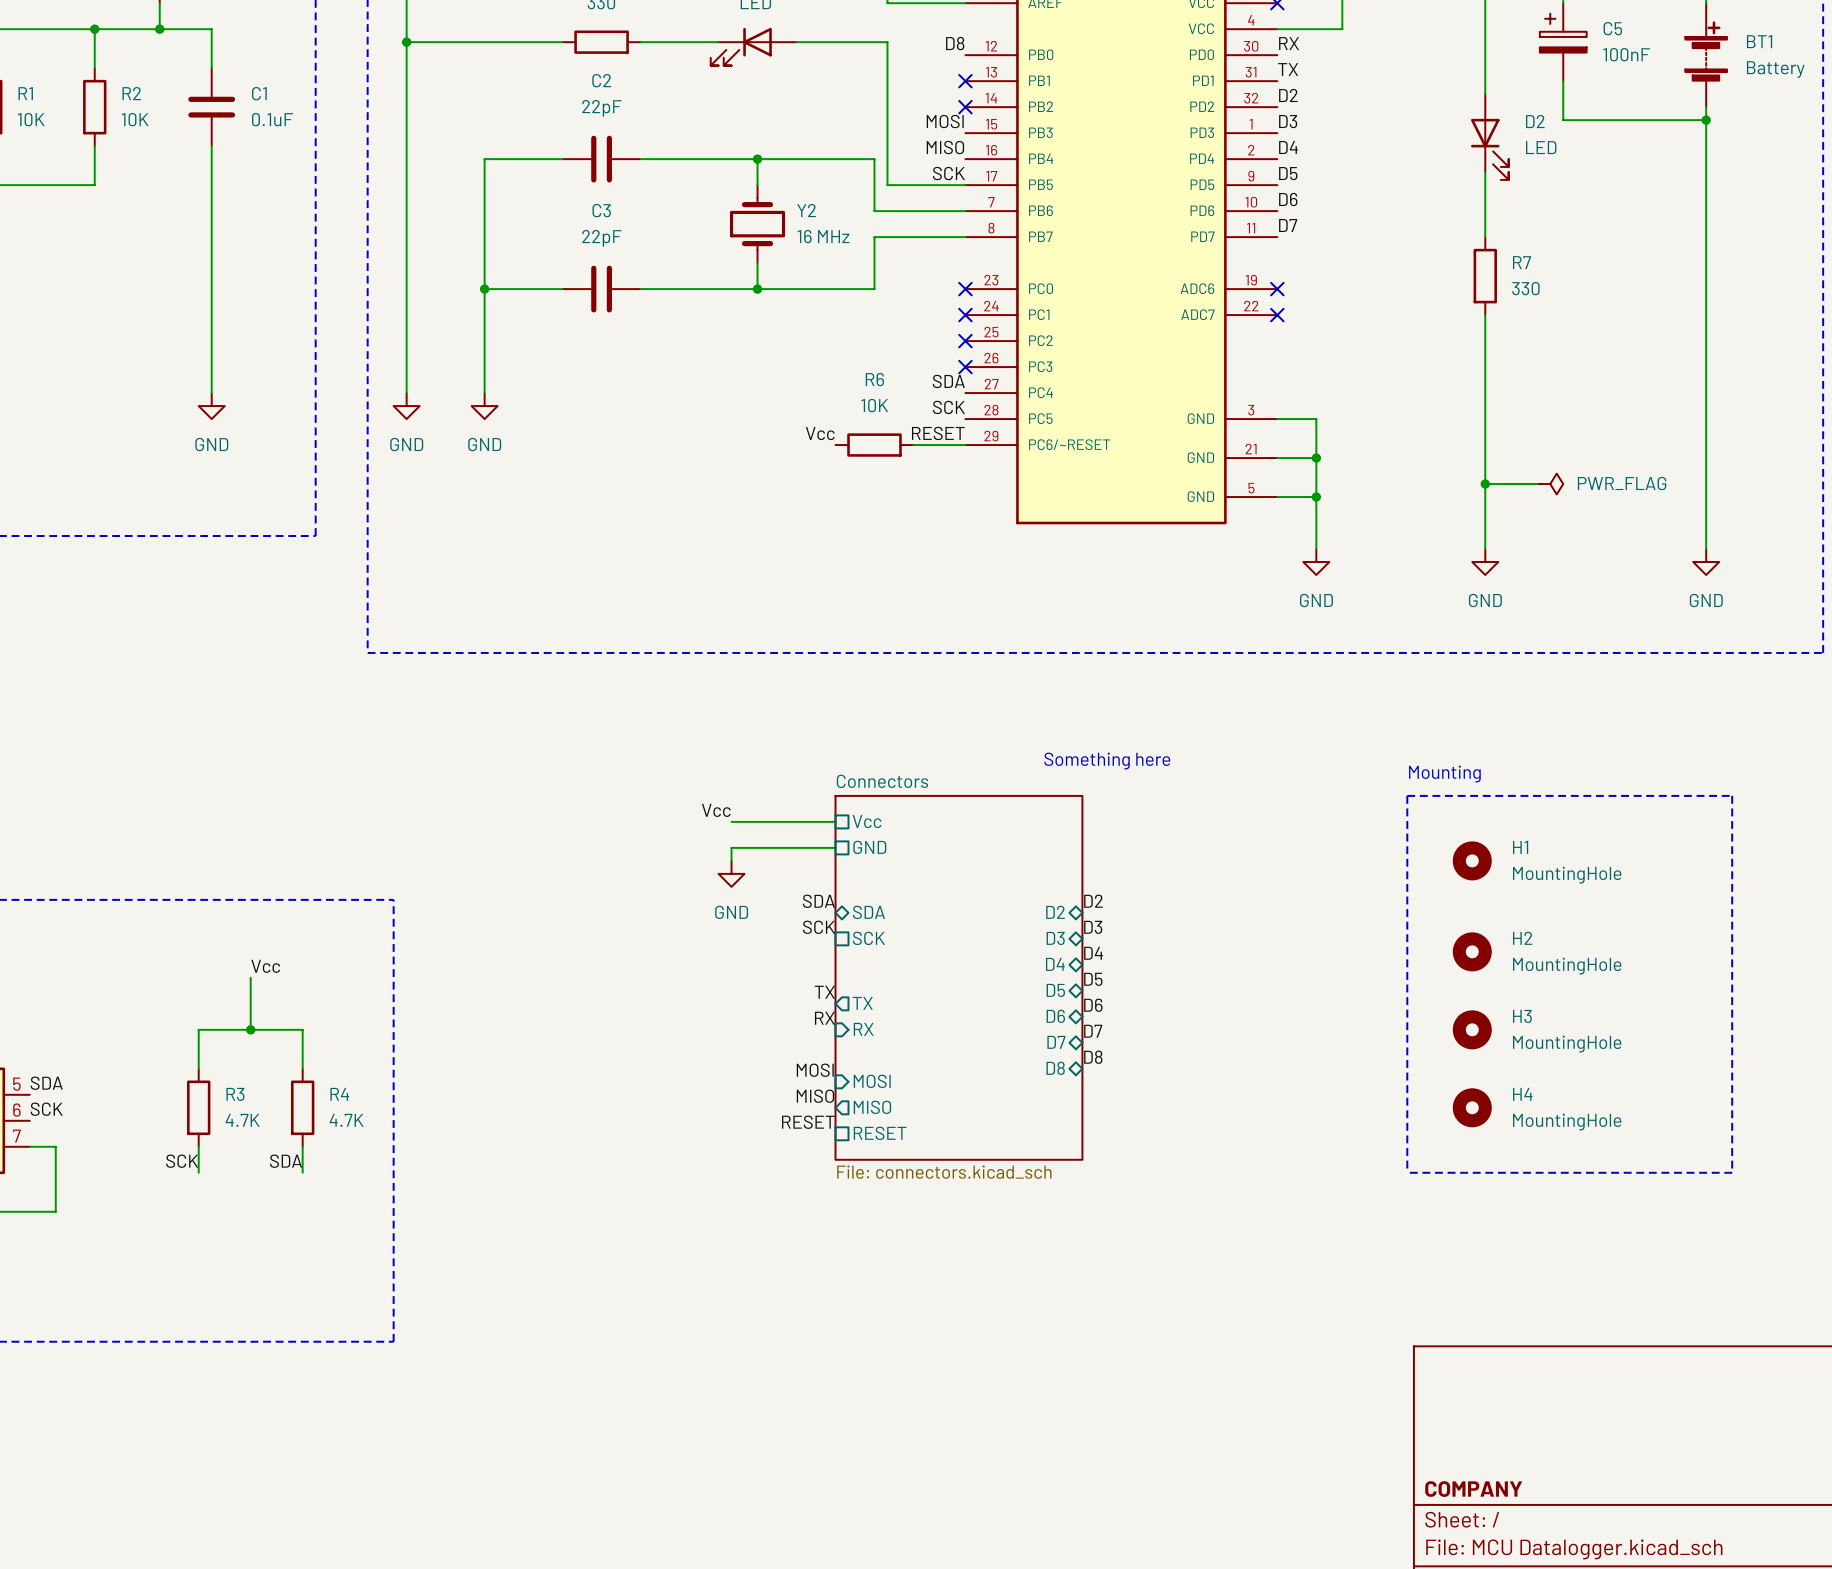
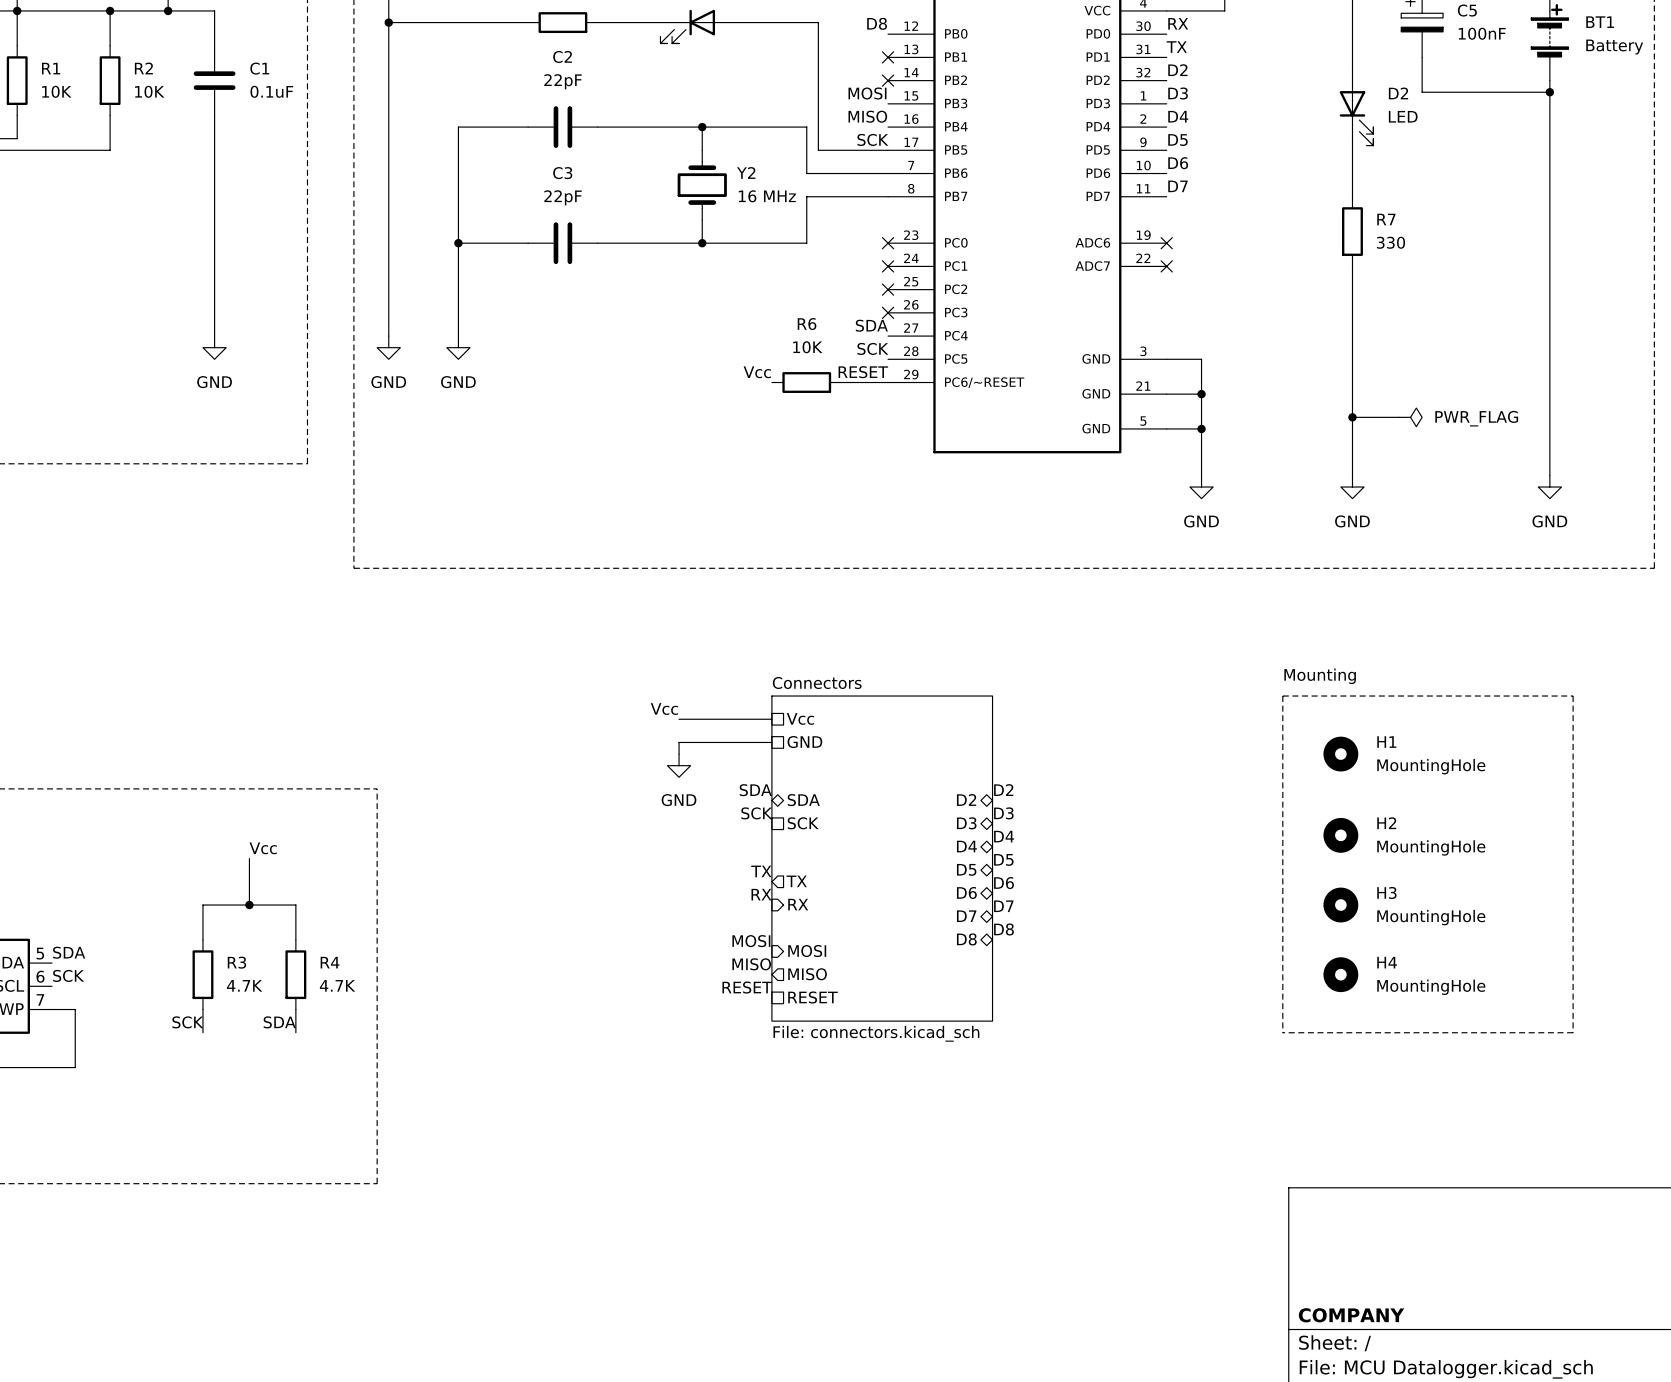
text: Something here (1107, 761) -> none

